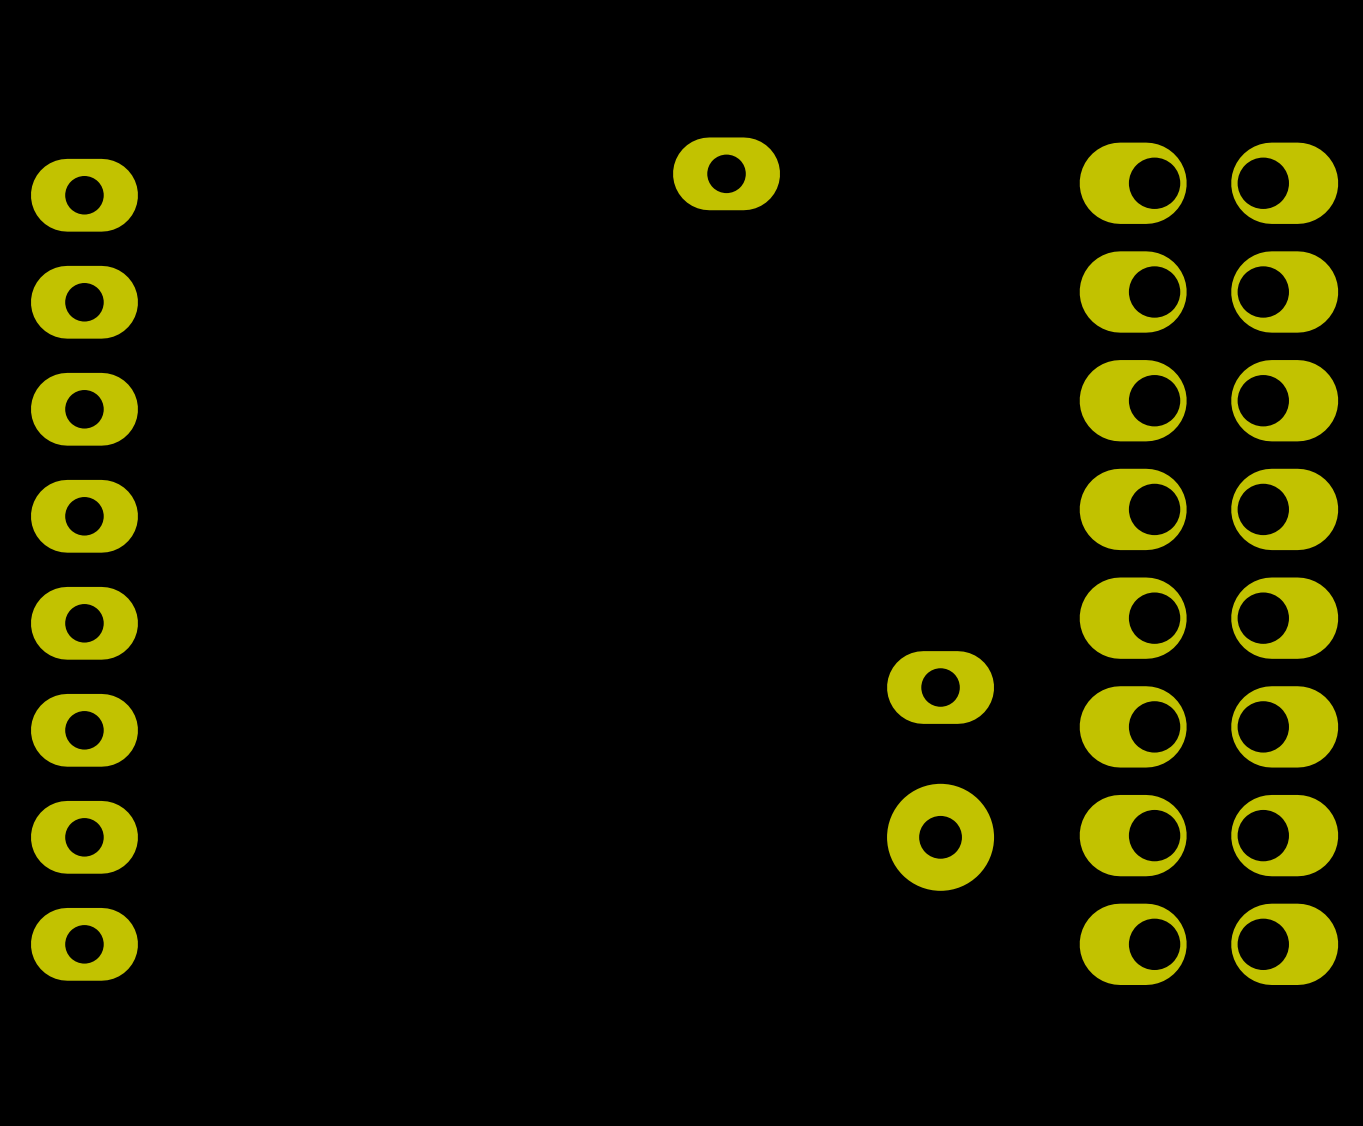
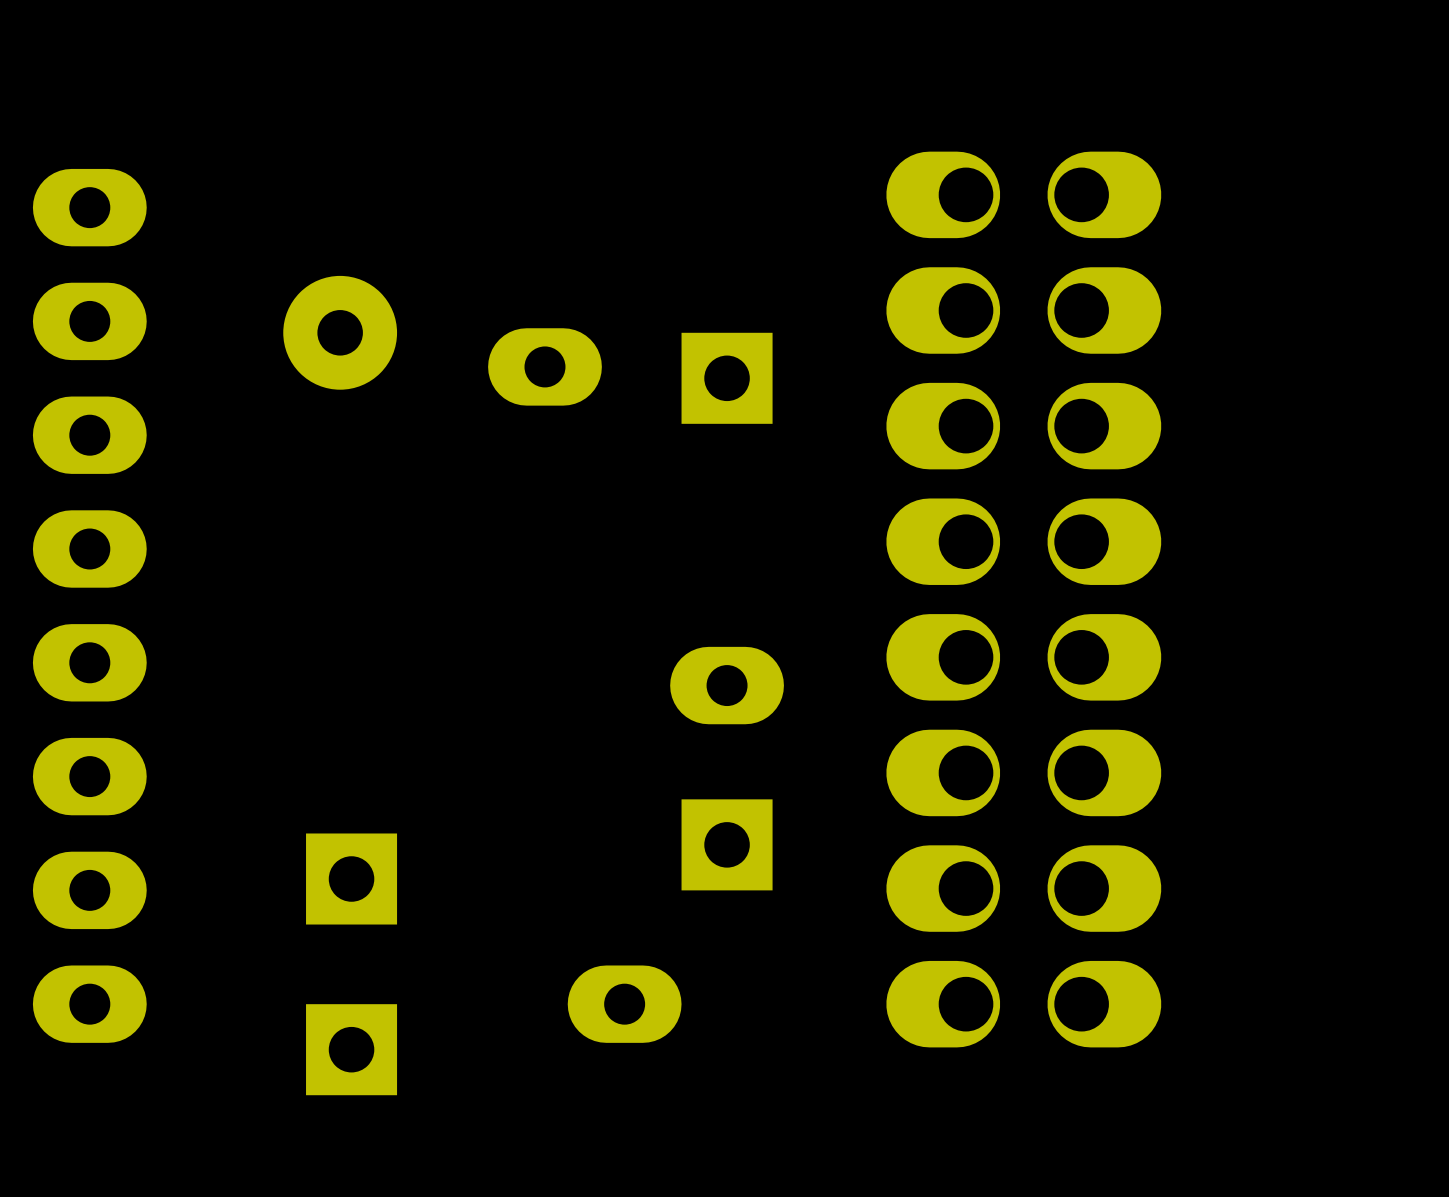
part: (726, 173) -> none
part: none -> (544, 366)
part: none -> (727, 378)
part position: (1208, 563) -> (1023, 599)
part: none -> (727, 685)
part: (940, 687) -> none
part: none -> (727, 844)
part: none -> (351, 879)
part position: (940, 837) -> (340, 332)
part: none -> (624, 1004)
part: none -> (351, 1049)

